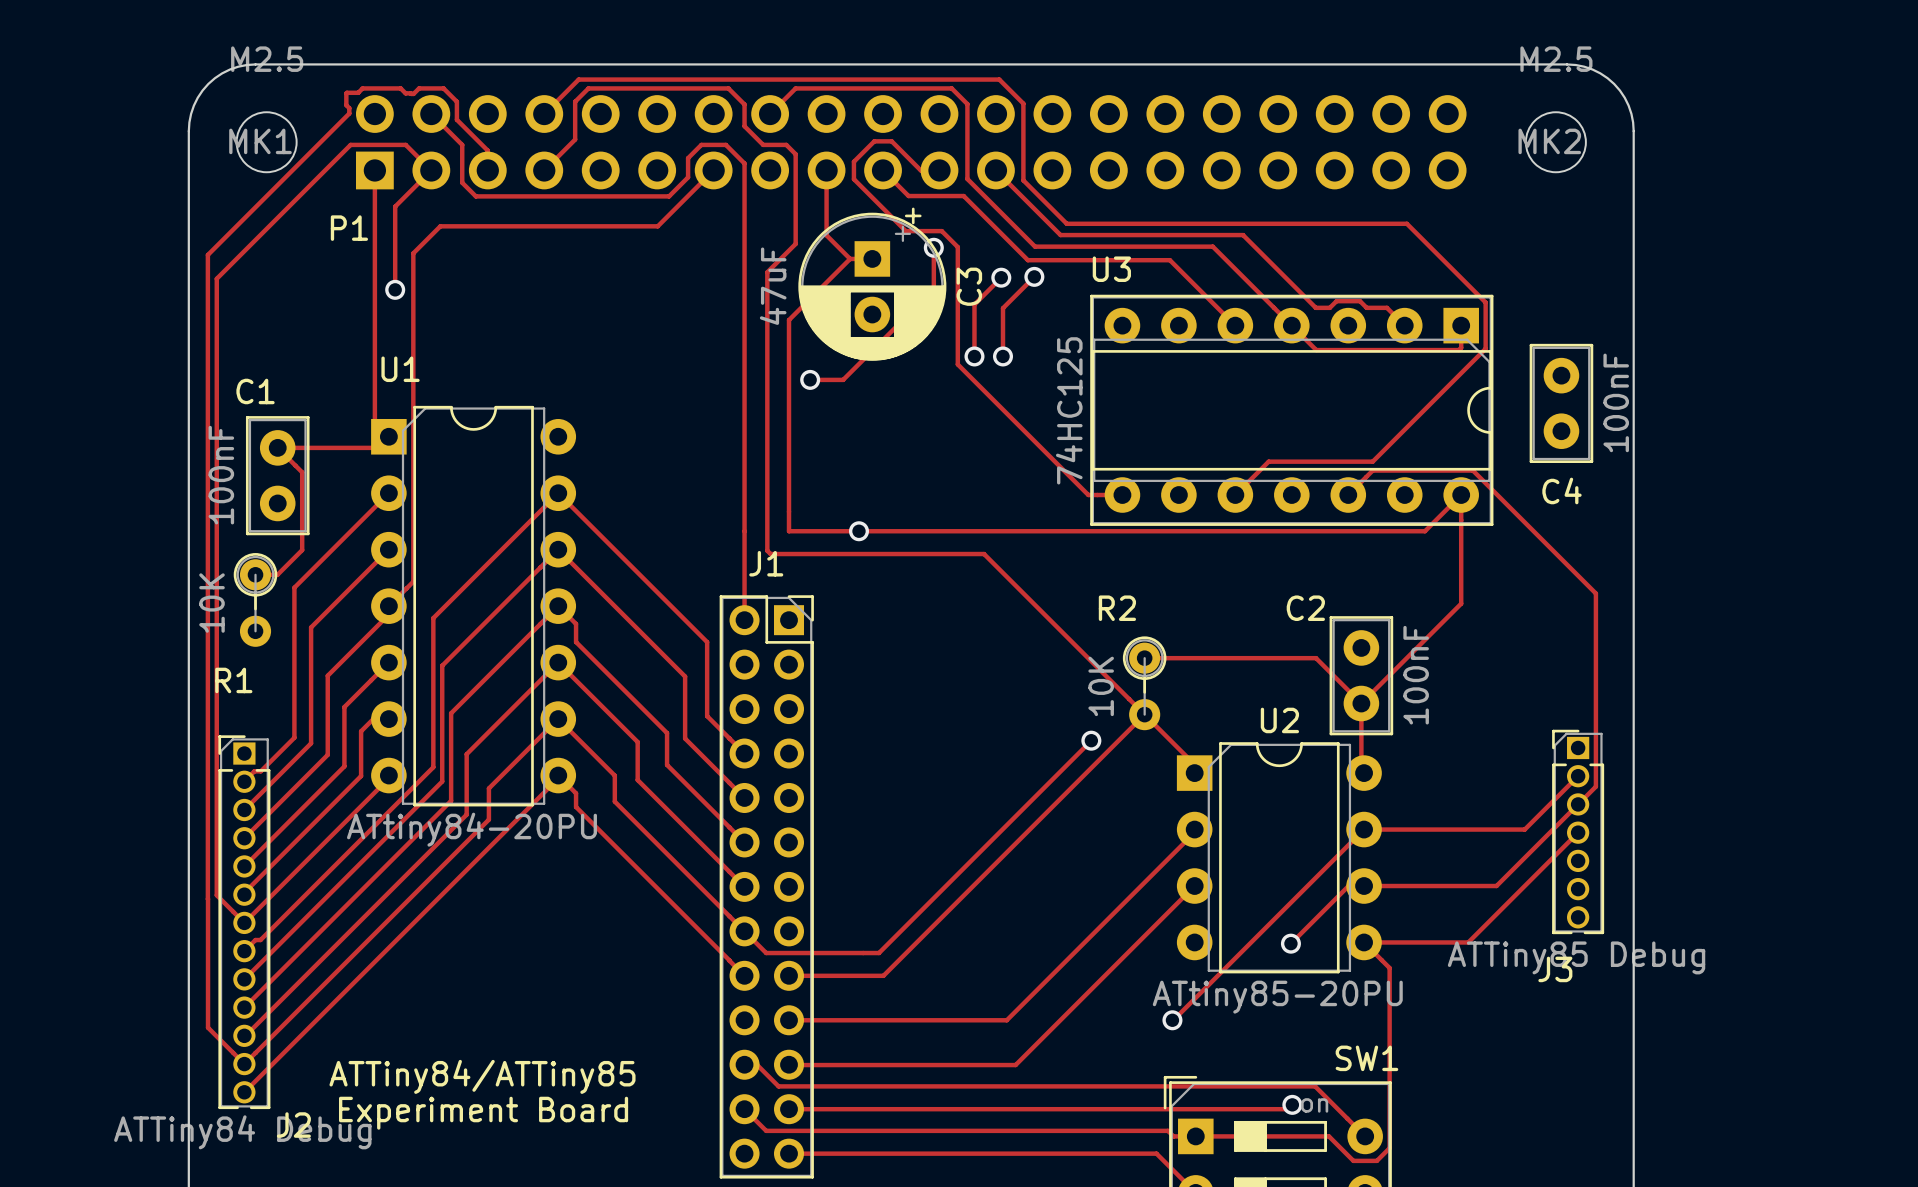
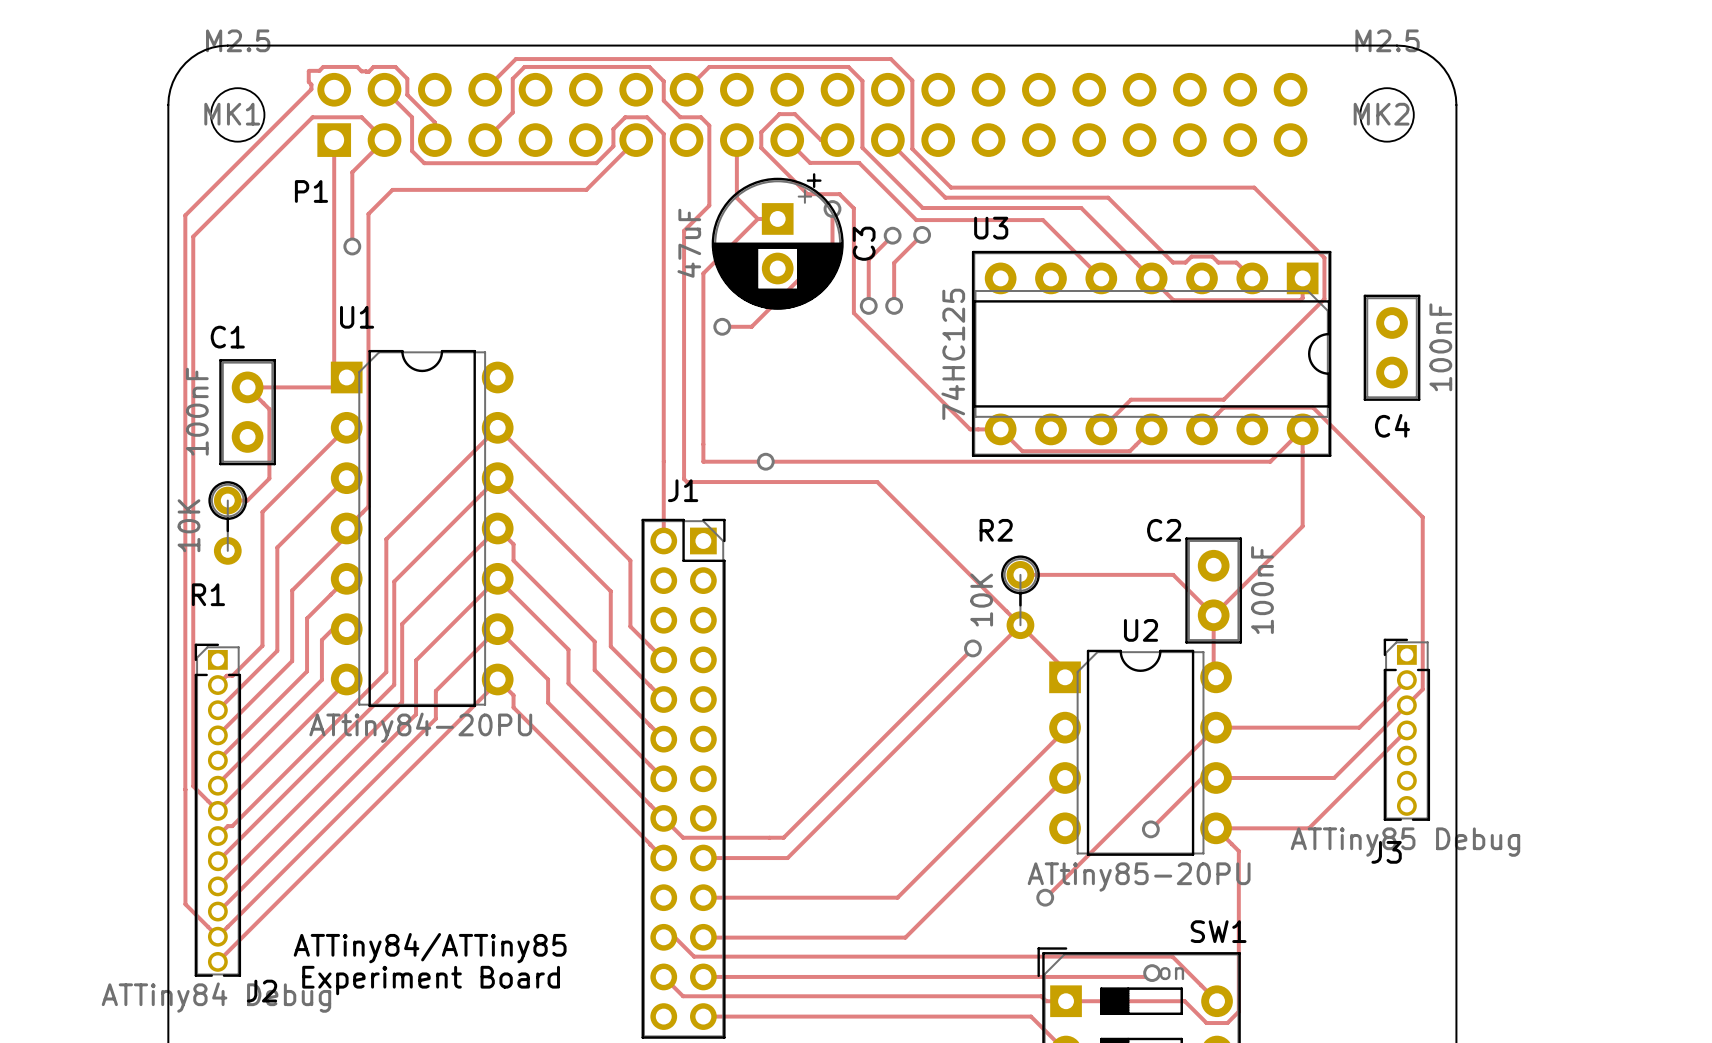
track: none -> (1000, 429) (1022, 451) (1129, 451) (1151, 429)

